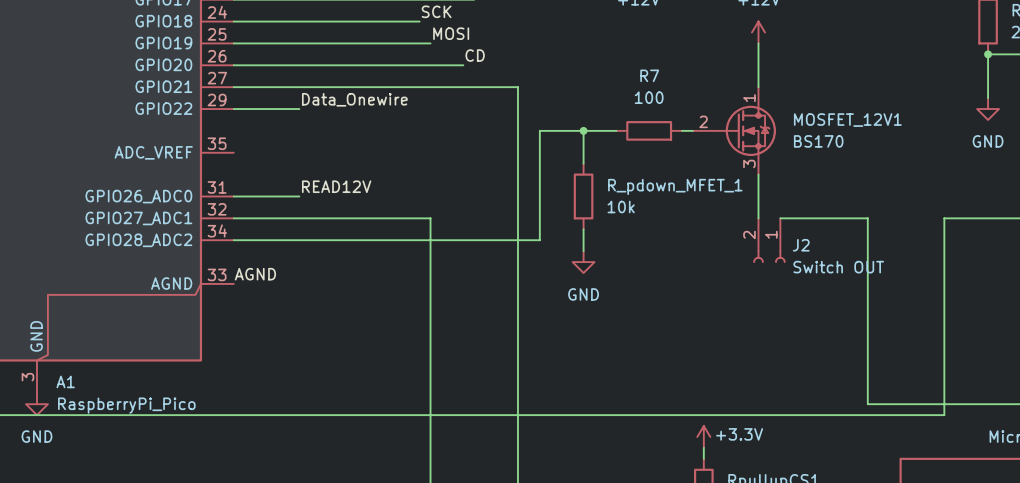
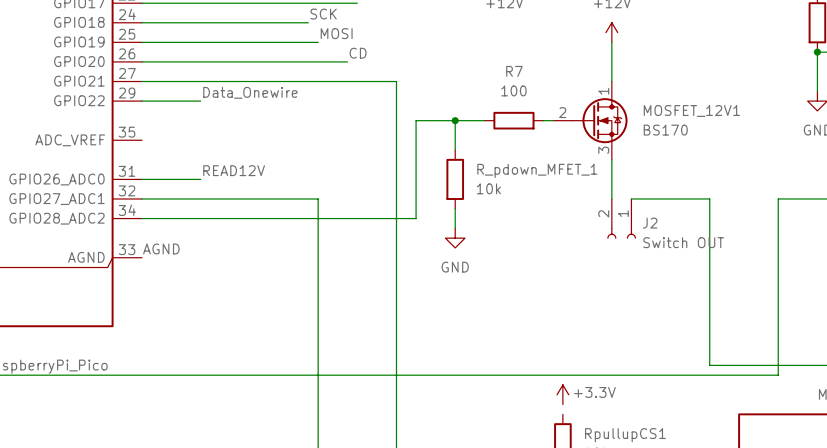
wire: (703, 447) (703, 458) -> none

